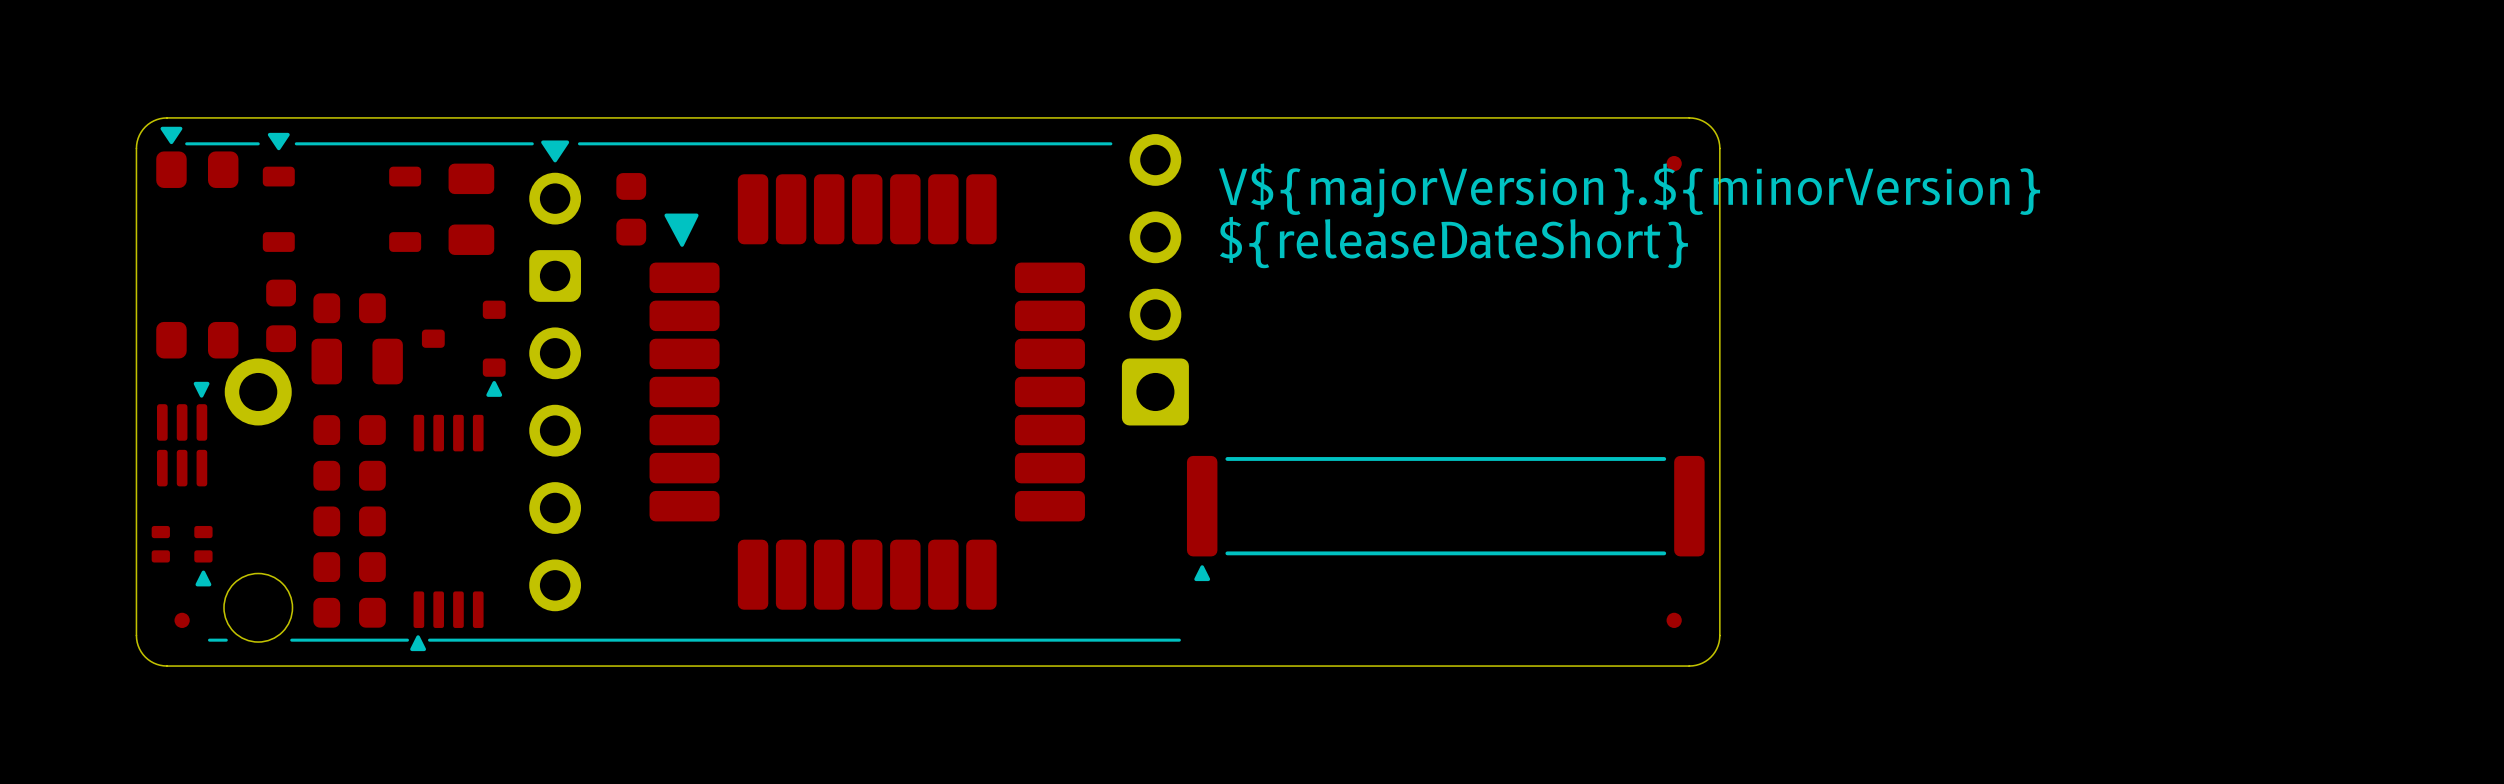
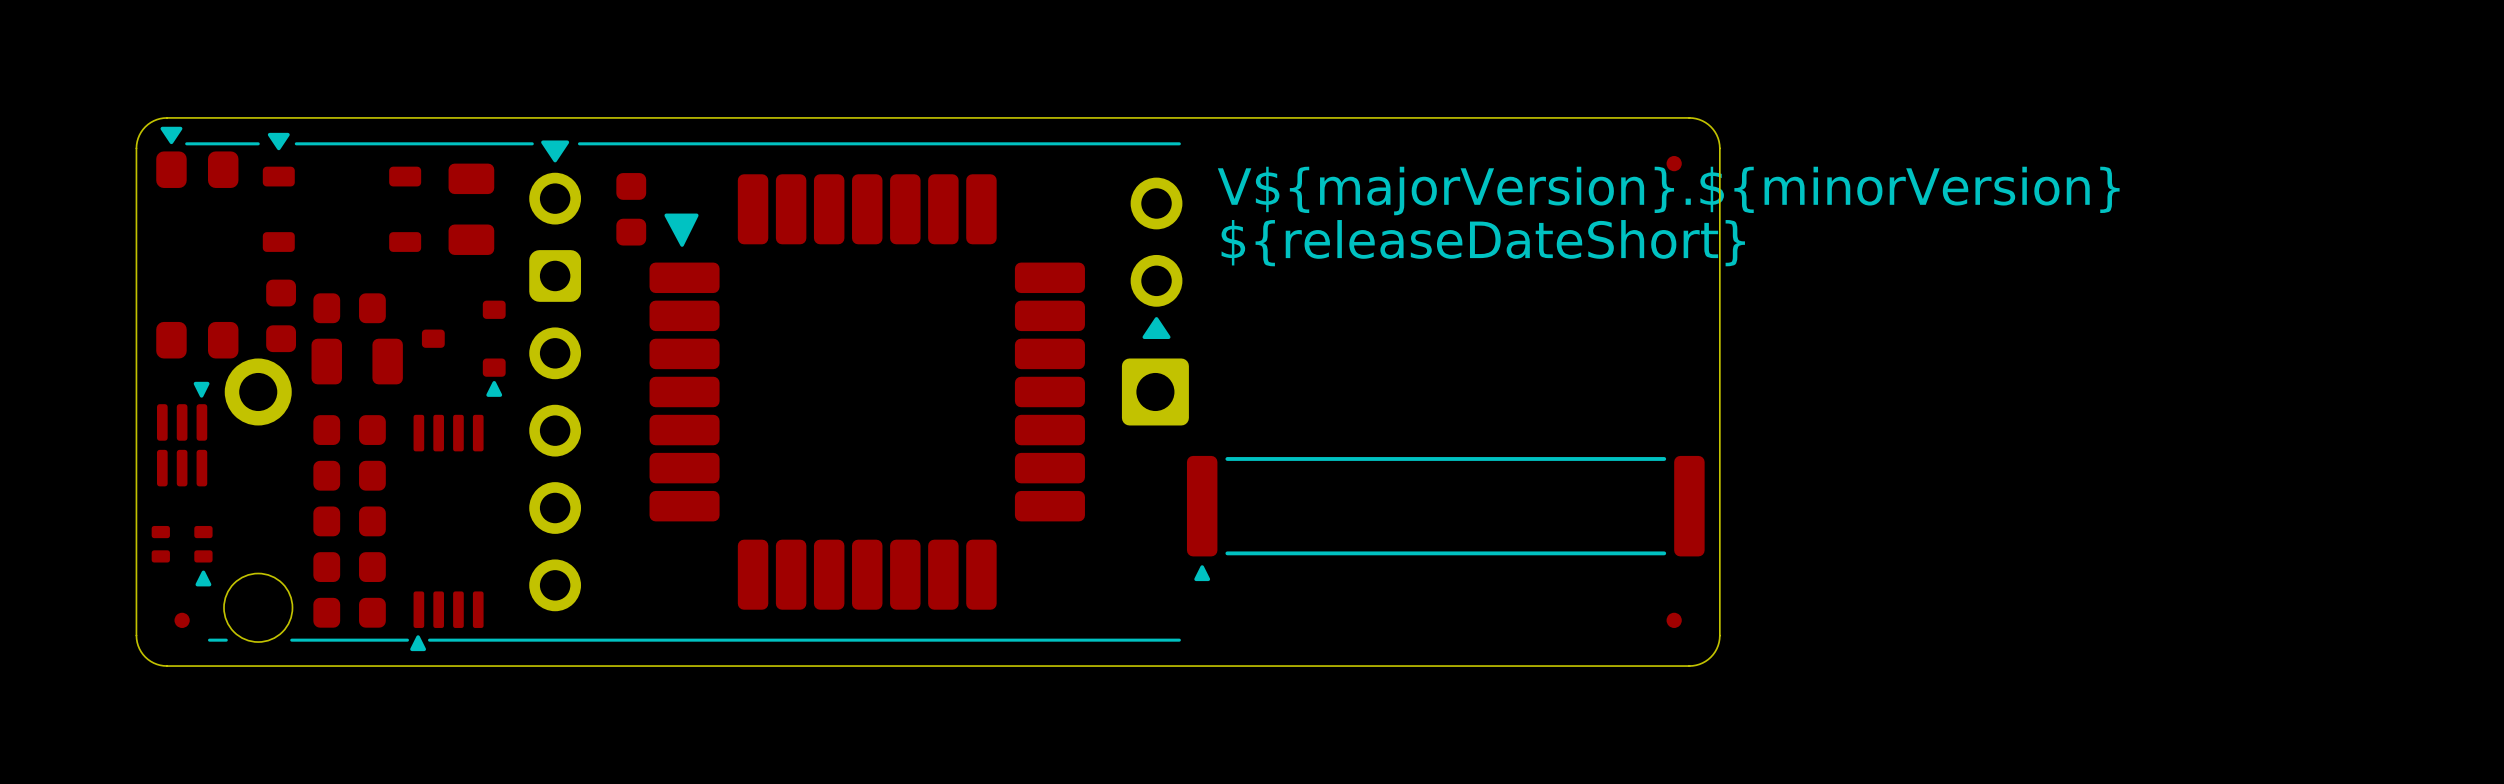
part footprint: [1129, 134, 1182, 341] -> [1130, 177, 1183, 340]
line: none -> (1110, 143) (1179, 143)

